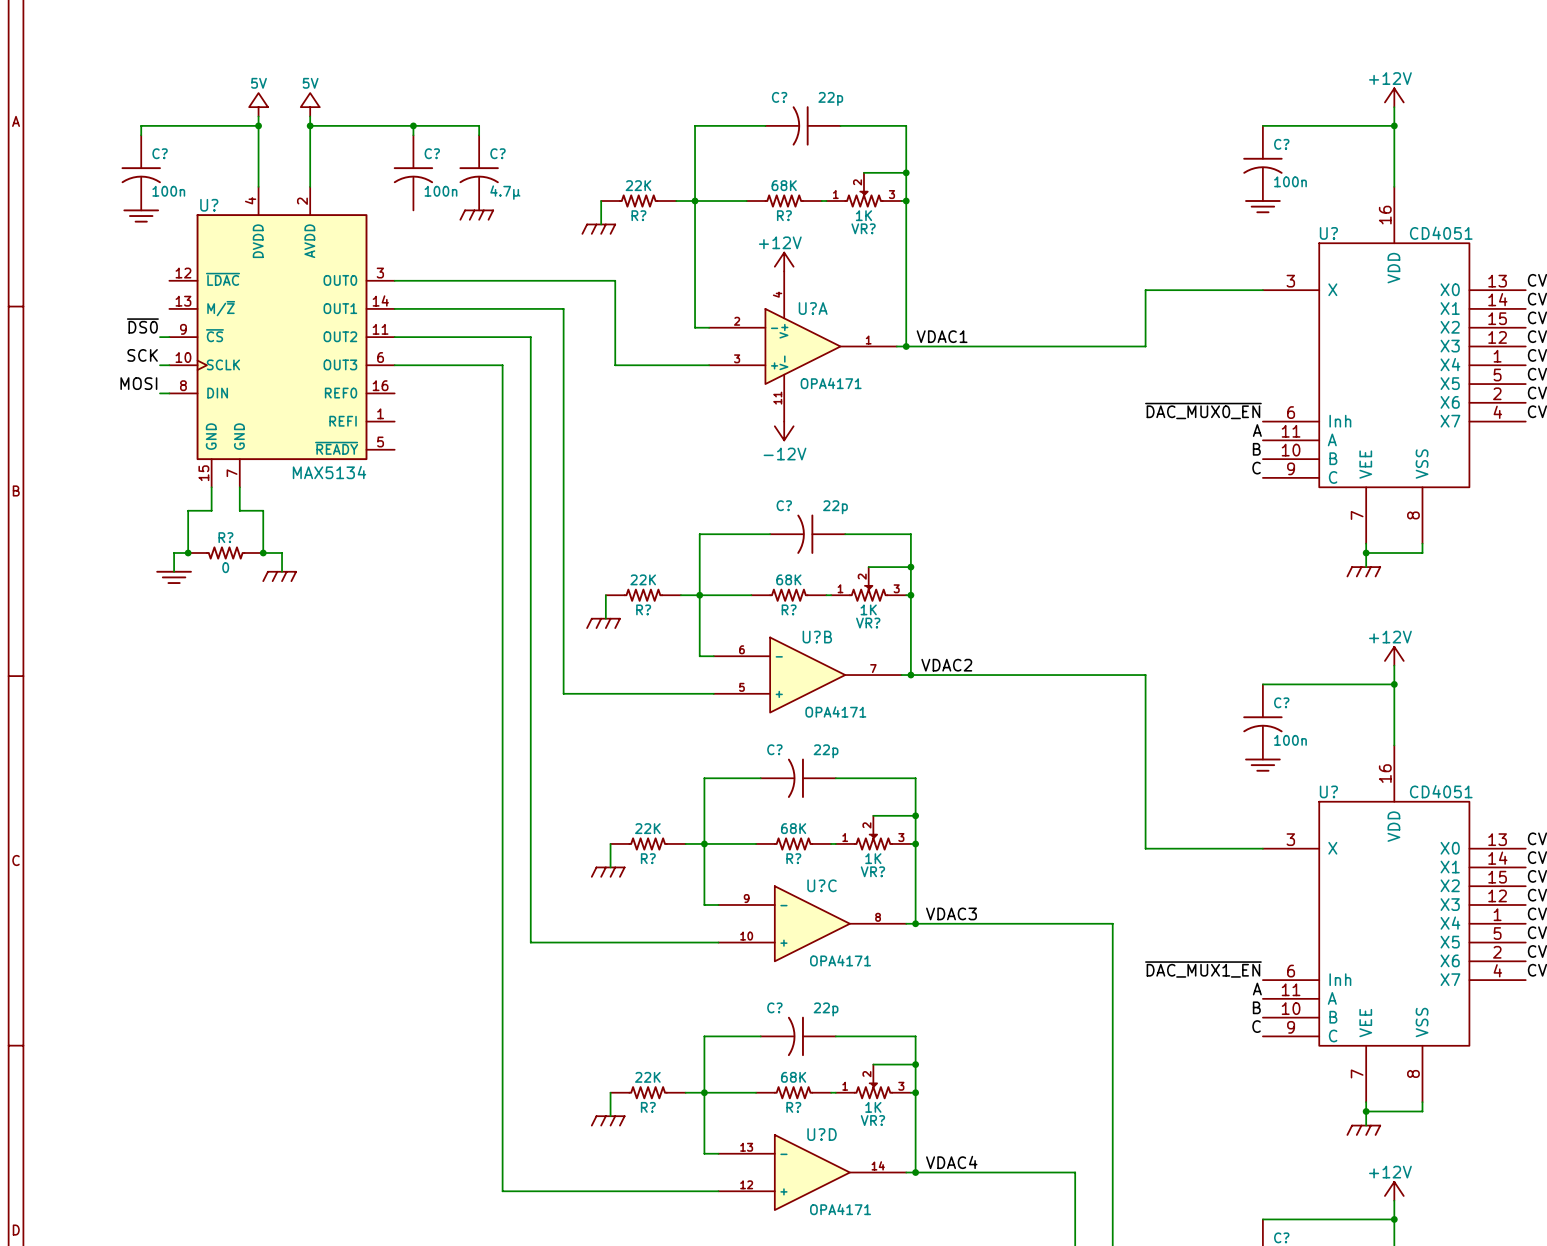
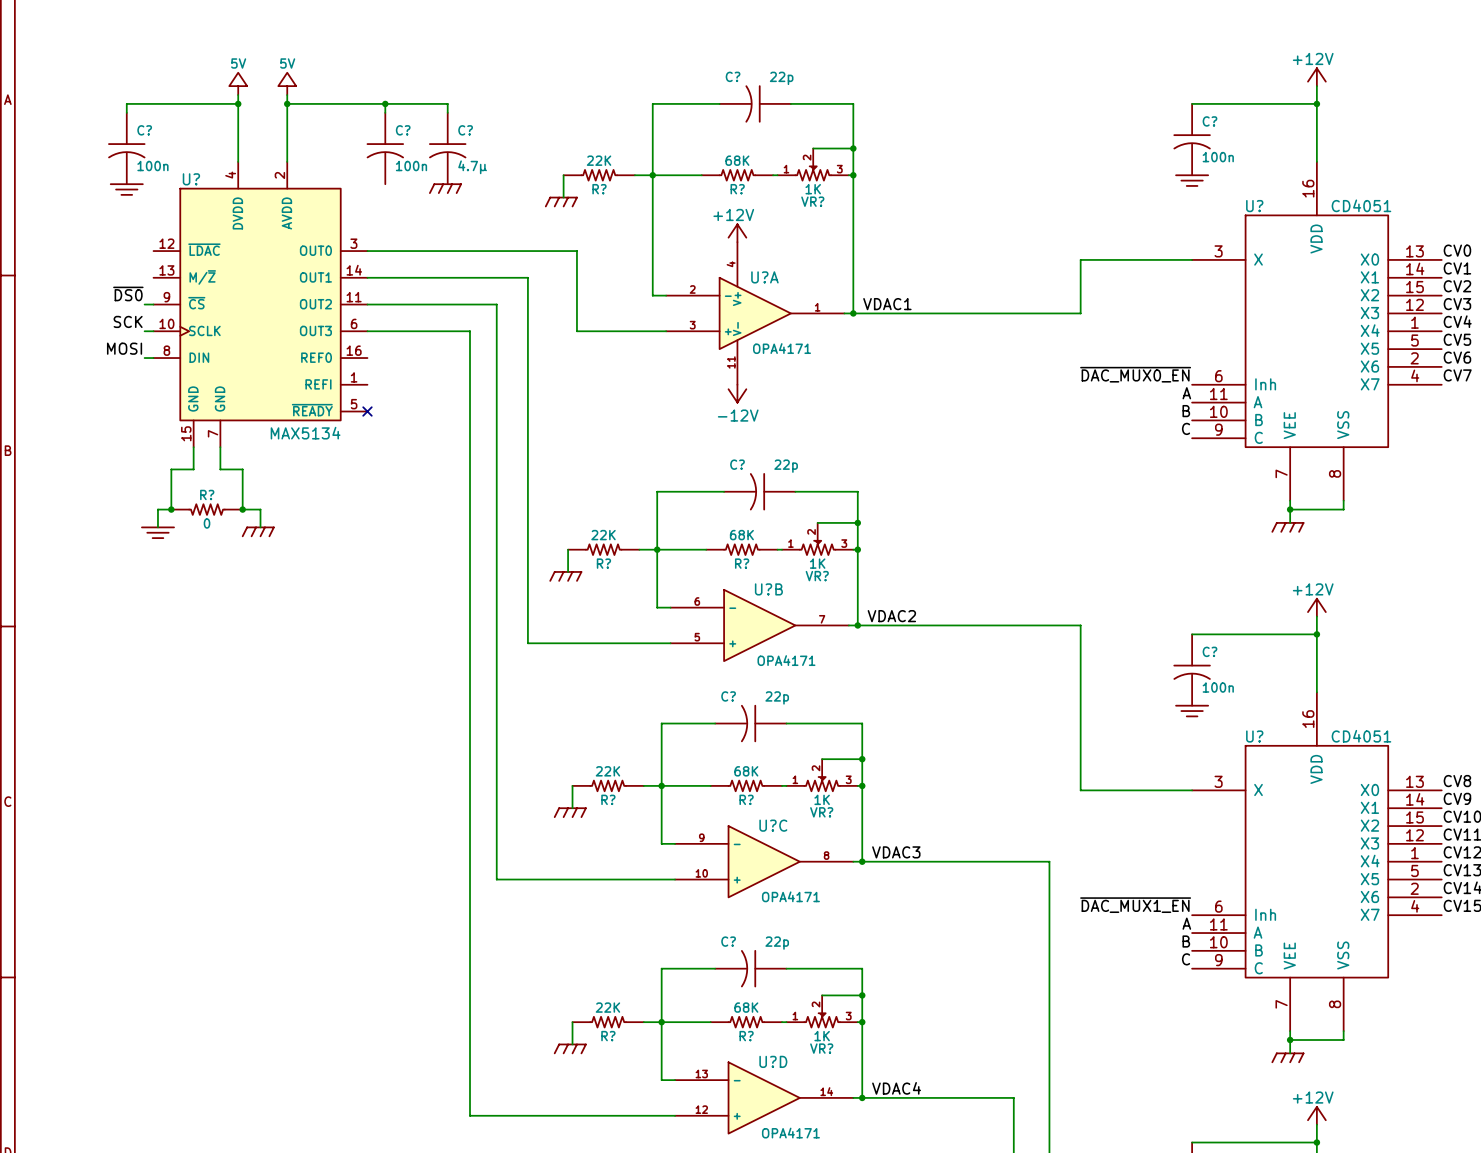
no-connect mark: none -> (367, 411)

